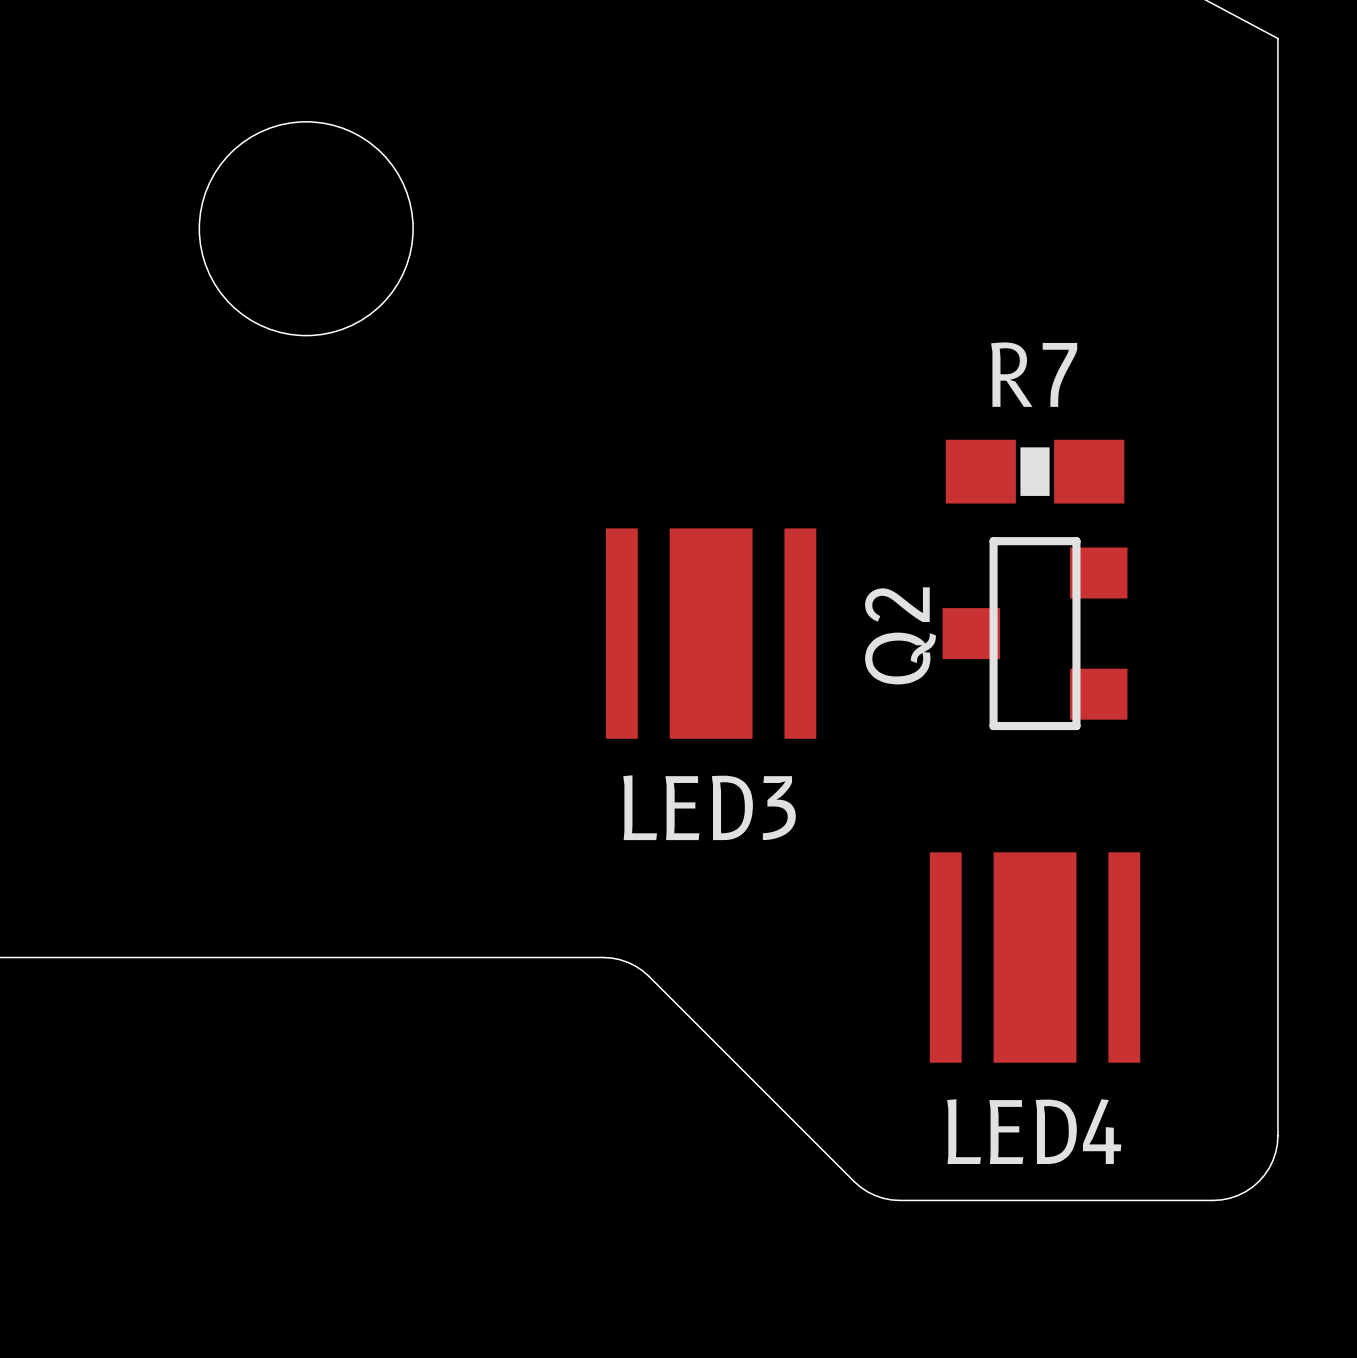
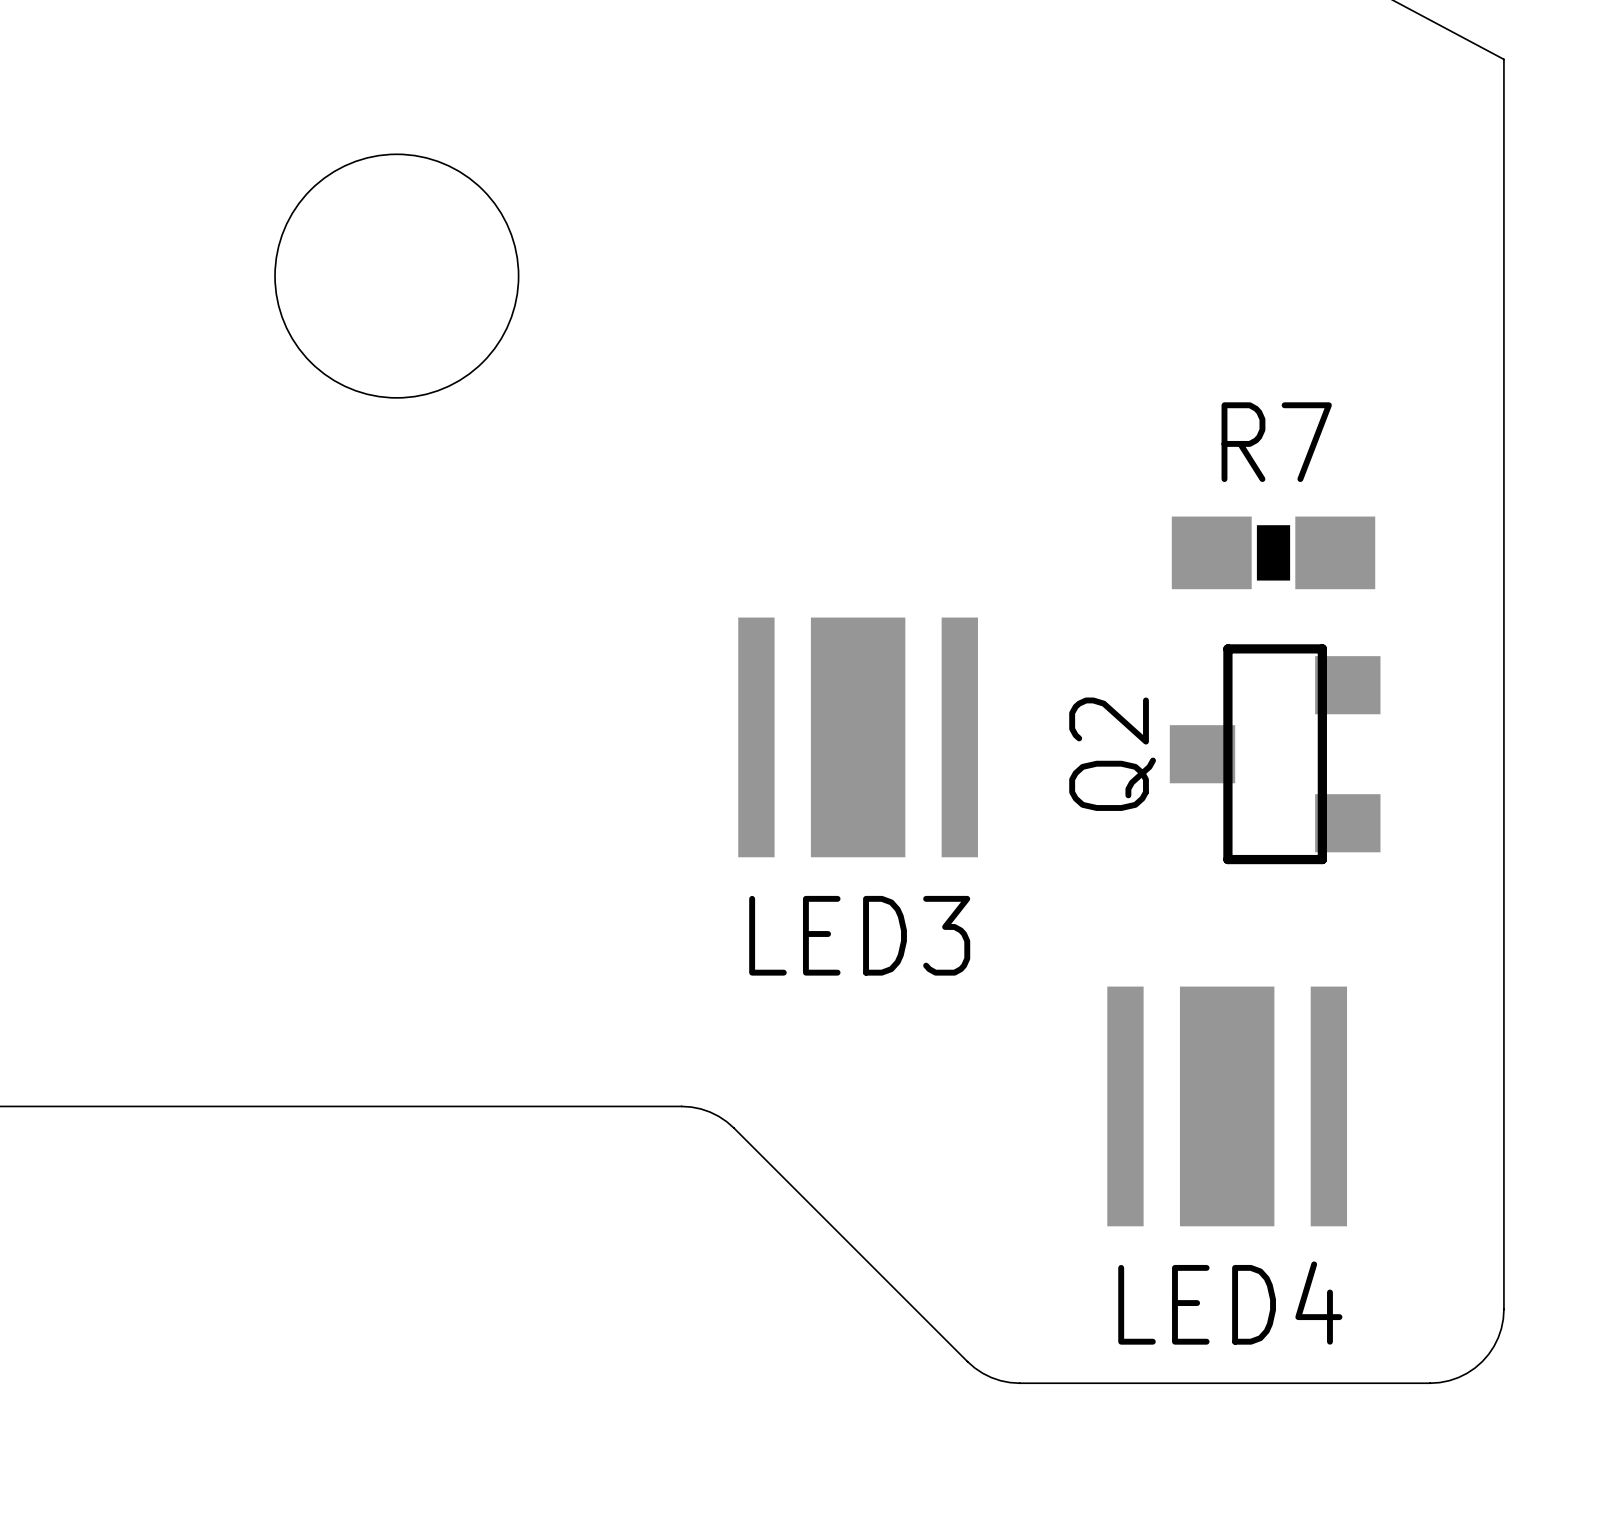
R7 position: (1035, 471) -> (1273, 552)
Q2 position: (1035, 633) -> (1275, 754)
Q2 name position: Q2 (900, 635) -> Q2 (1112, 754)
board edge: (556, 957) (611, 958) (628, 962) (642, 970) (854, 1181) (875, 1195) (899, 1200) -> (681, 1106) (710, 1112) (733, 1128) (974, 1367) (991, 1377) (1010, 1382) (1073, 1383)

